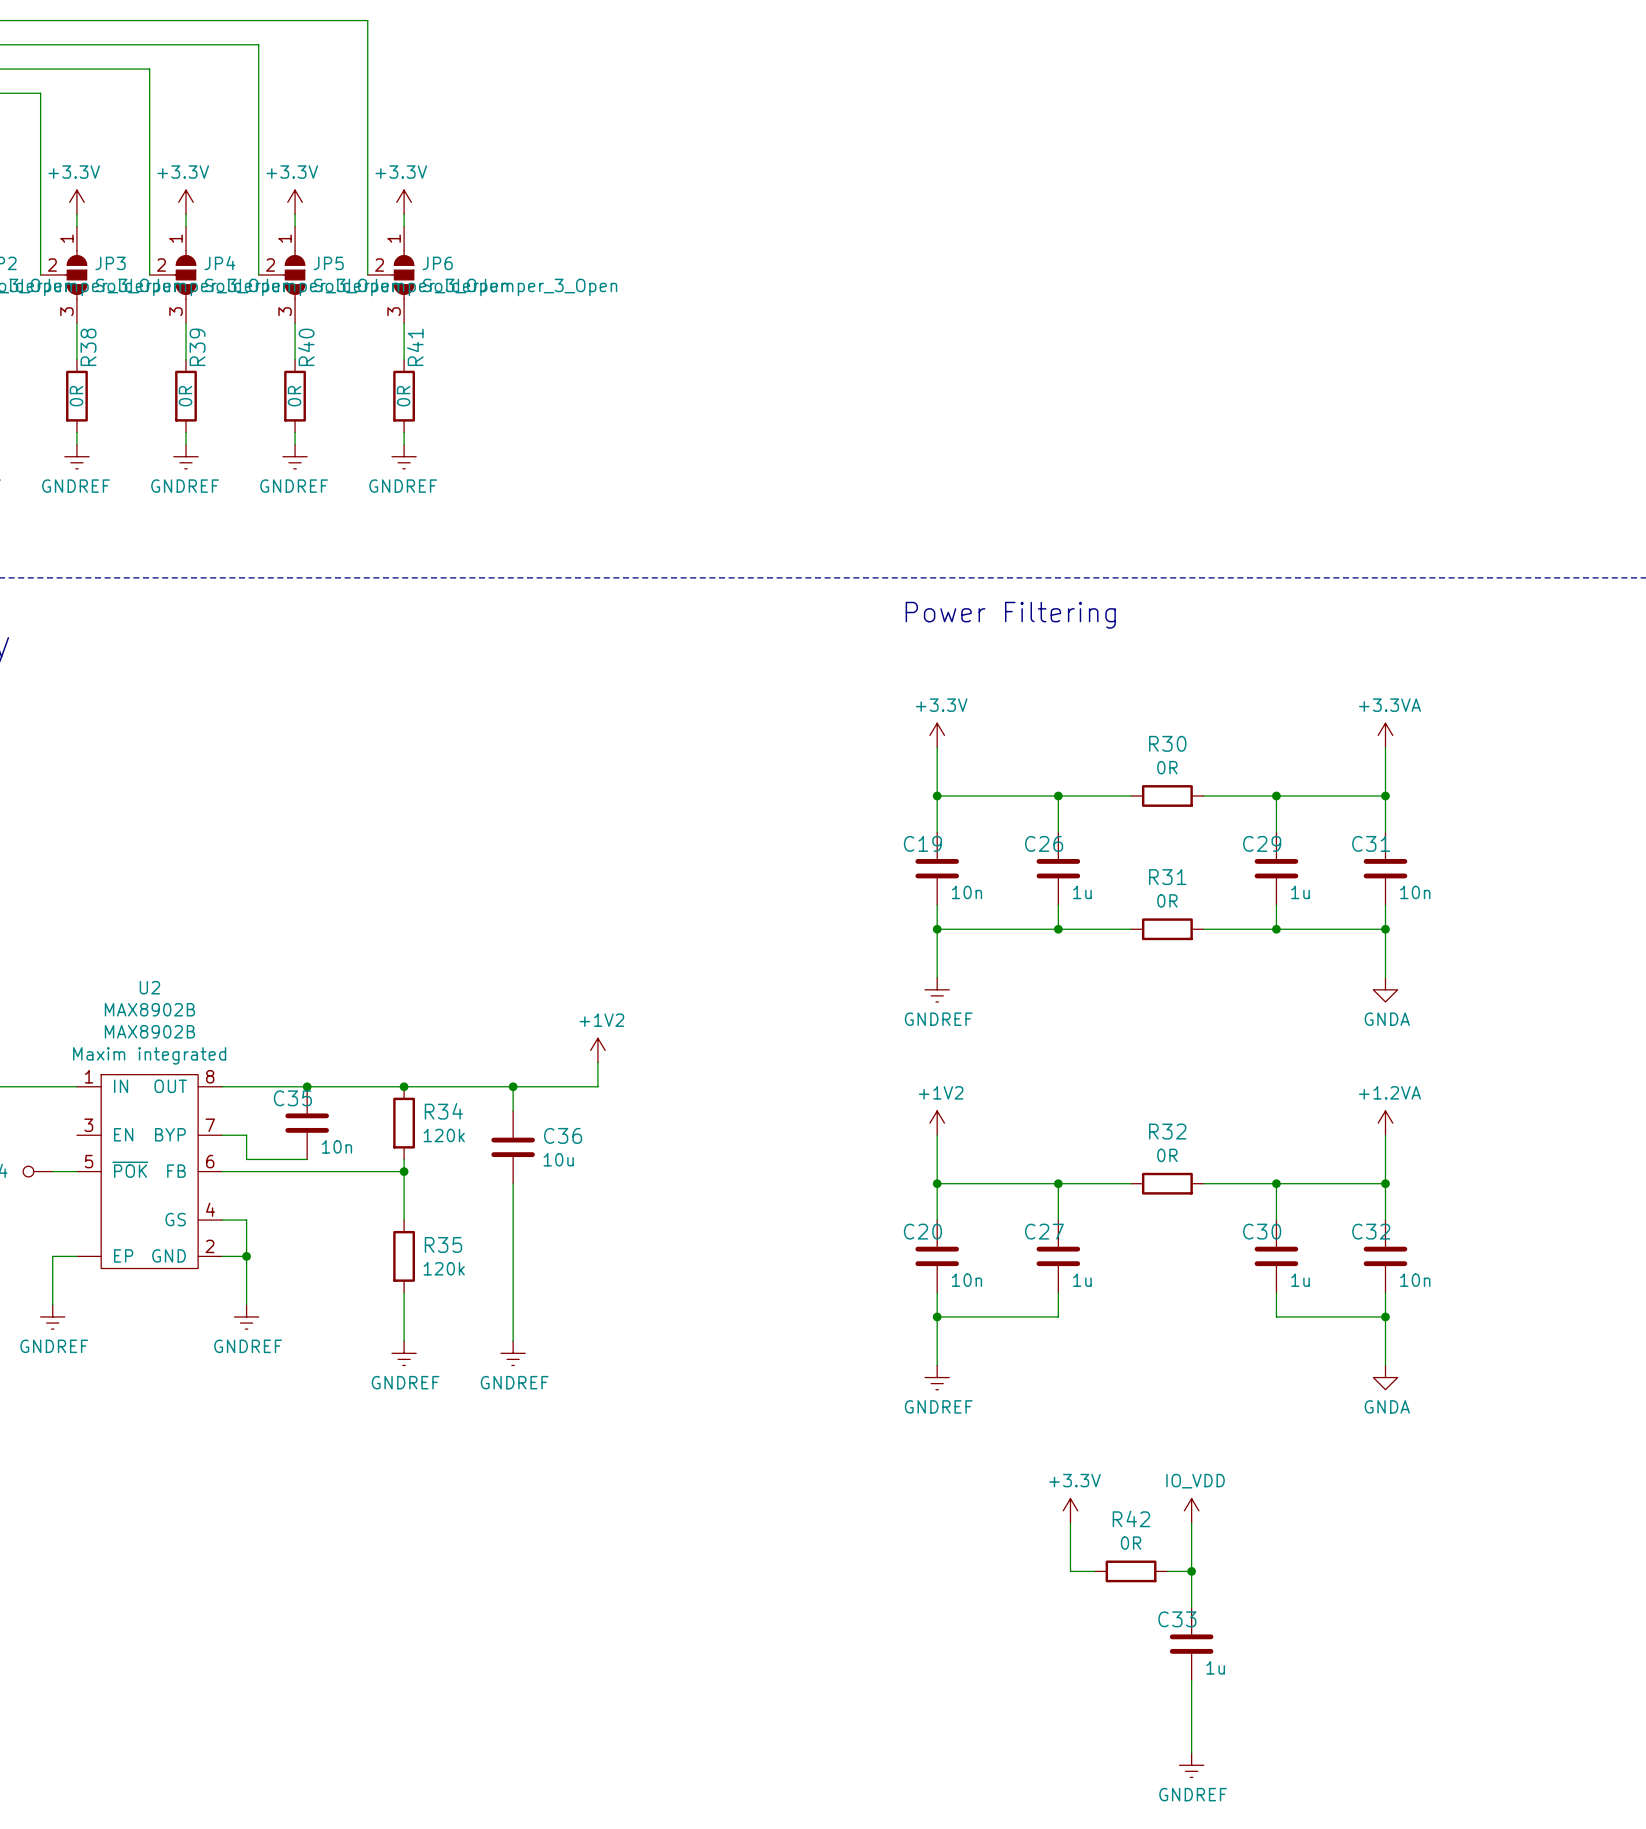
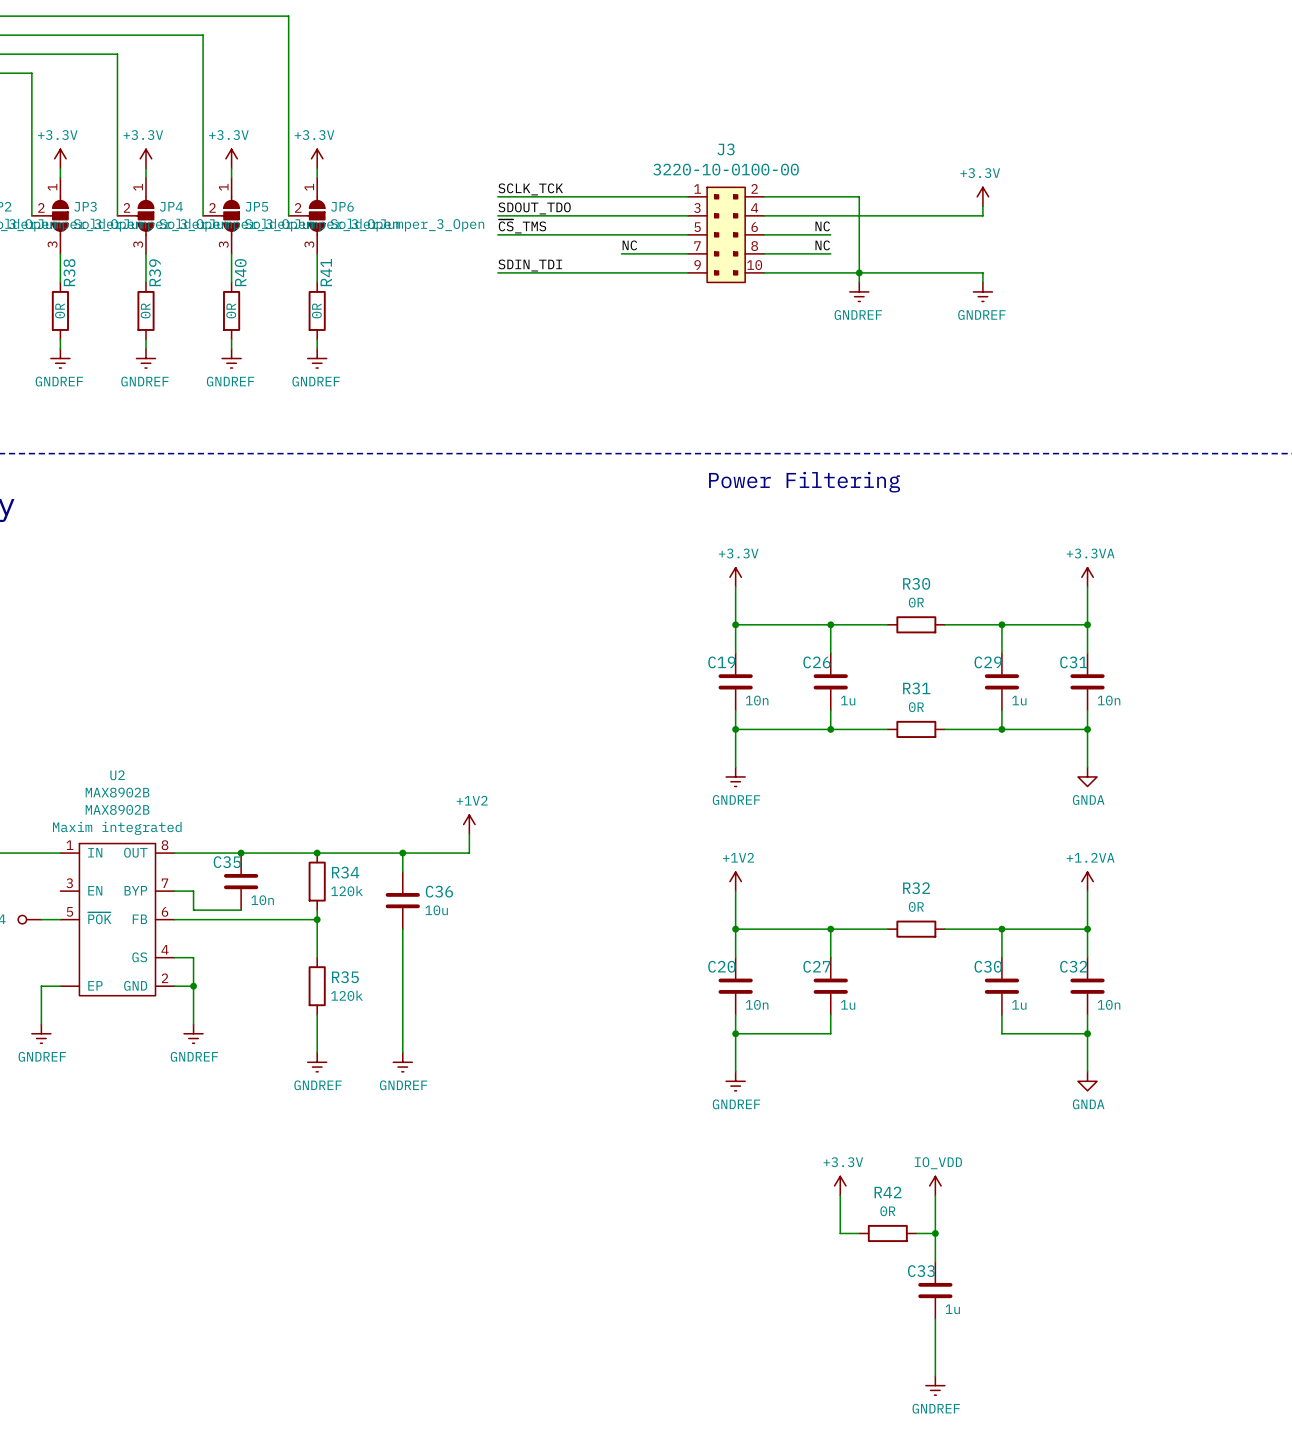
label: none -> SCLK_TCK (530, 189)
wire: none -> (497, 196) (688, 196)
wire: none -> (764, 196) (859, 196) (859, 282)
power symbol: none -> +3.3V (982, 196)
wire: none -> (982, 206) (982, 215) (764, 215)
label: none -> SDOUT_TDO (534, 208)
wire: none -> (497, 215) (688, 215)
label: none -> ~{CS}_TMS (522, 226)
label: none -> NC (822, 226)
wire: none -> (497, 234) (688, 234)
J3: none -> 3220-10-0100-00 (726, 234)
wire: none -> (764, 234) (830, 234)
label: none -> NC (629, 245)
label: none -> NC (822, 245)
wire: none -> (621, 253) (688, 253)
wire: none -> (764, 253) (830, 253)
label: none -> SDIN_TDI (530, 265)
wire: none -> (497, 272) (688, 272)
wire: none -> (764, 272) (982, 272) (982, 282)
junction: none -> (859, 272)
power symbol: none -> GNDREF (859, 291)
power symbol: none -> GNDREF (982, 291)

